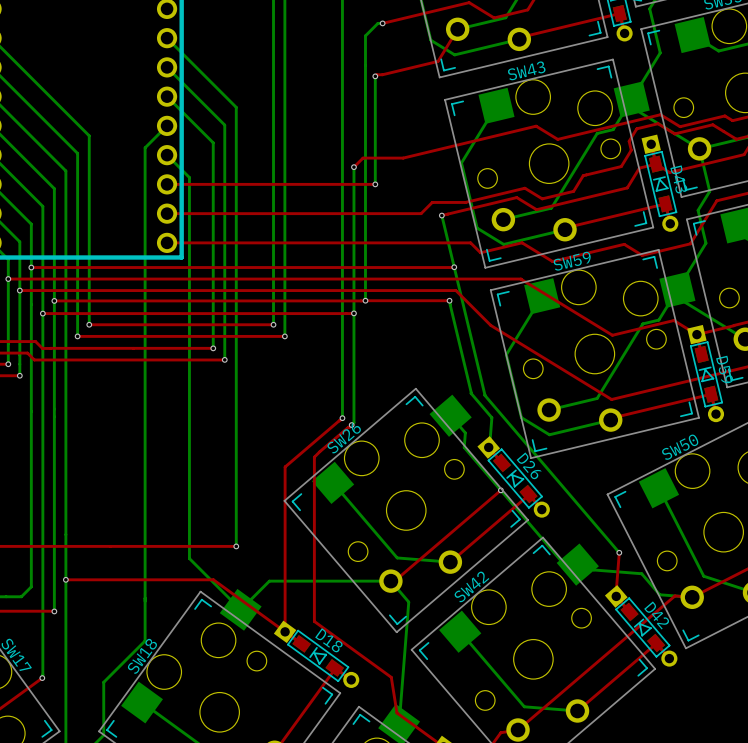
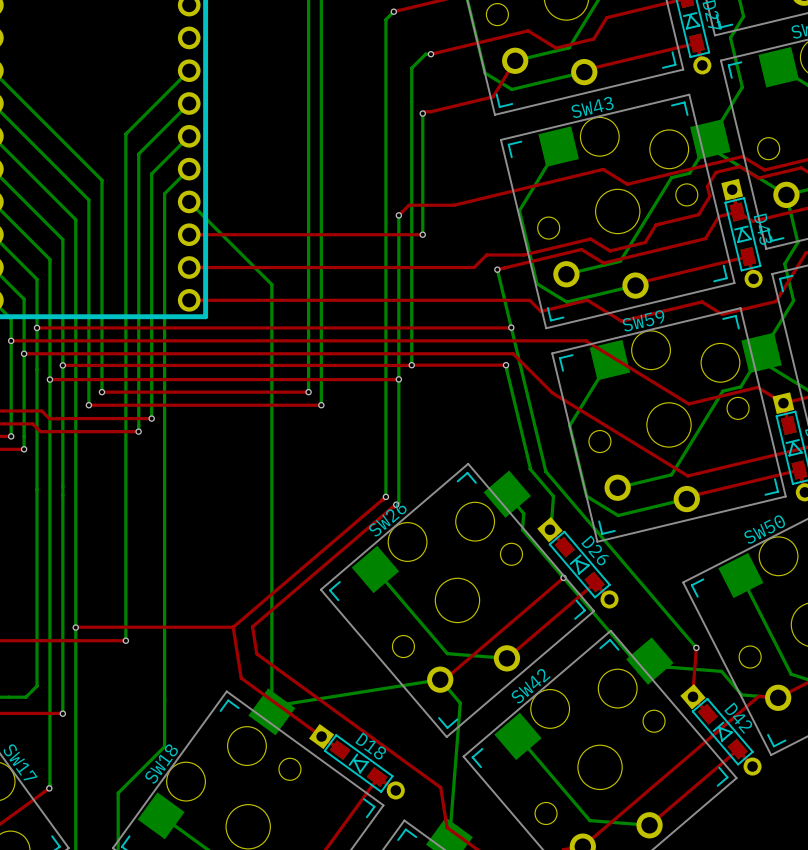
bottom track: (167, 38) (236, 107) (236, 546) -> (189, 70) (125, 134) (125, 640)
bottom track: (167, 67) (224, 125) (224, 359) -> (189, 103) (138, 153) (138, 431)
bottom track: (167, 96) (213, 142) (213, 348) -> (189, 136) (151, 173) (151, 418)
bottom track: (189, 177) (189, 558) (240, 609) (269, 581) (390, 581) -> (214, 227) (271, 284) (271, 711)
top track: (133, 348) (213, 348) -> none
via: none -> (151, 418)
via: (213, 348) -> none
top track: (121, 359) (224, 359) -> none
via: none -> (138, 431)
via: (224, 359) -> none
top track: (319, 451) (314, 457) (314, 621) -> (360, 534) (252, 626)
top track: (285, 466) (285, 631) -> (322, 551) (233, 627)
via: none -> (75, 627)
top track: none -> (76, 627) (233, 627)
top track: none -> (252, 626) (256, 653) (354, 724)
top track: (110, 546) (236, 546) -> none
via: none -> (125, 640)
via: (236, 546) -> none
top track: (65, 579) (213, 579) -> (233, 627) (241, 678)
via: (65, 579) -> none
bottom track: none -> (440, 679) (276, 705)

